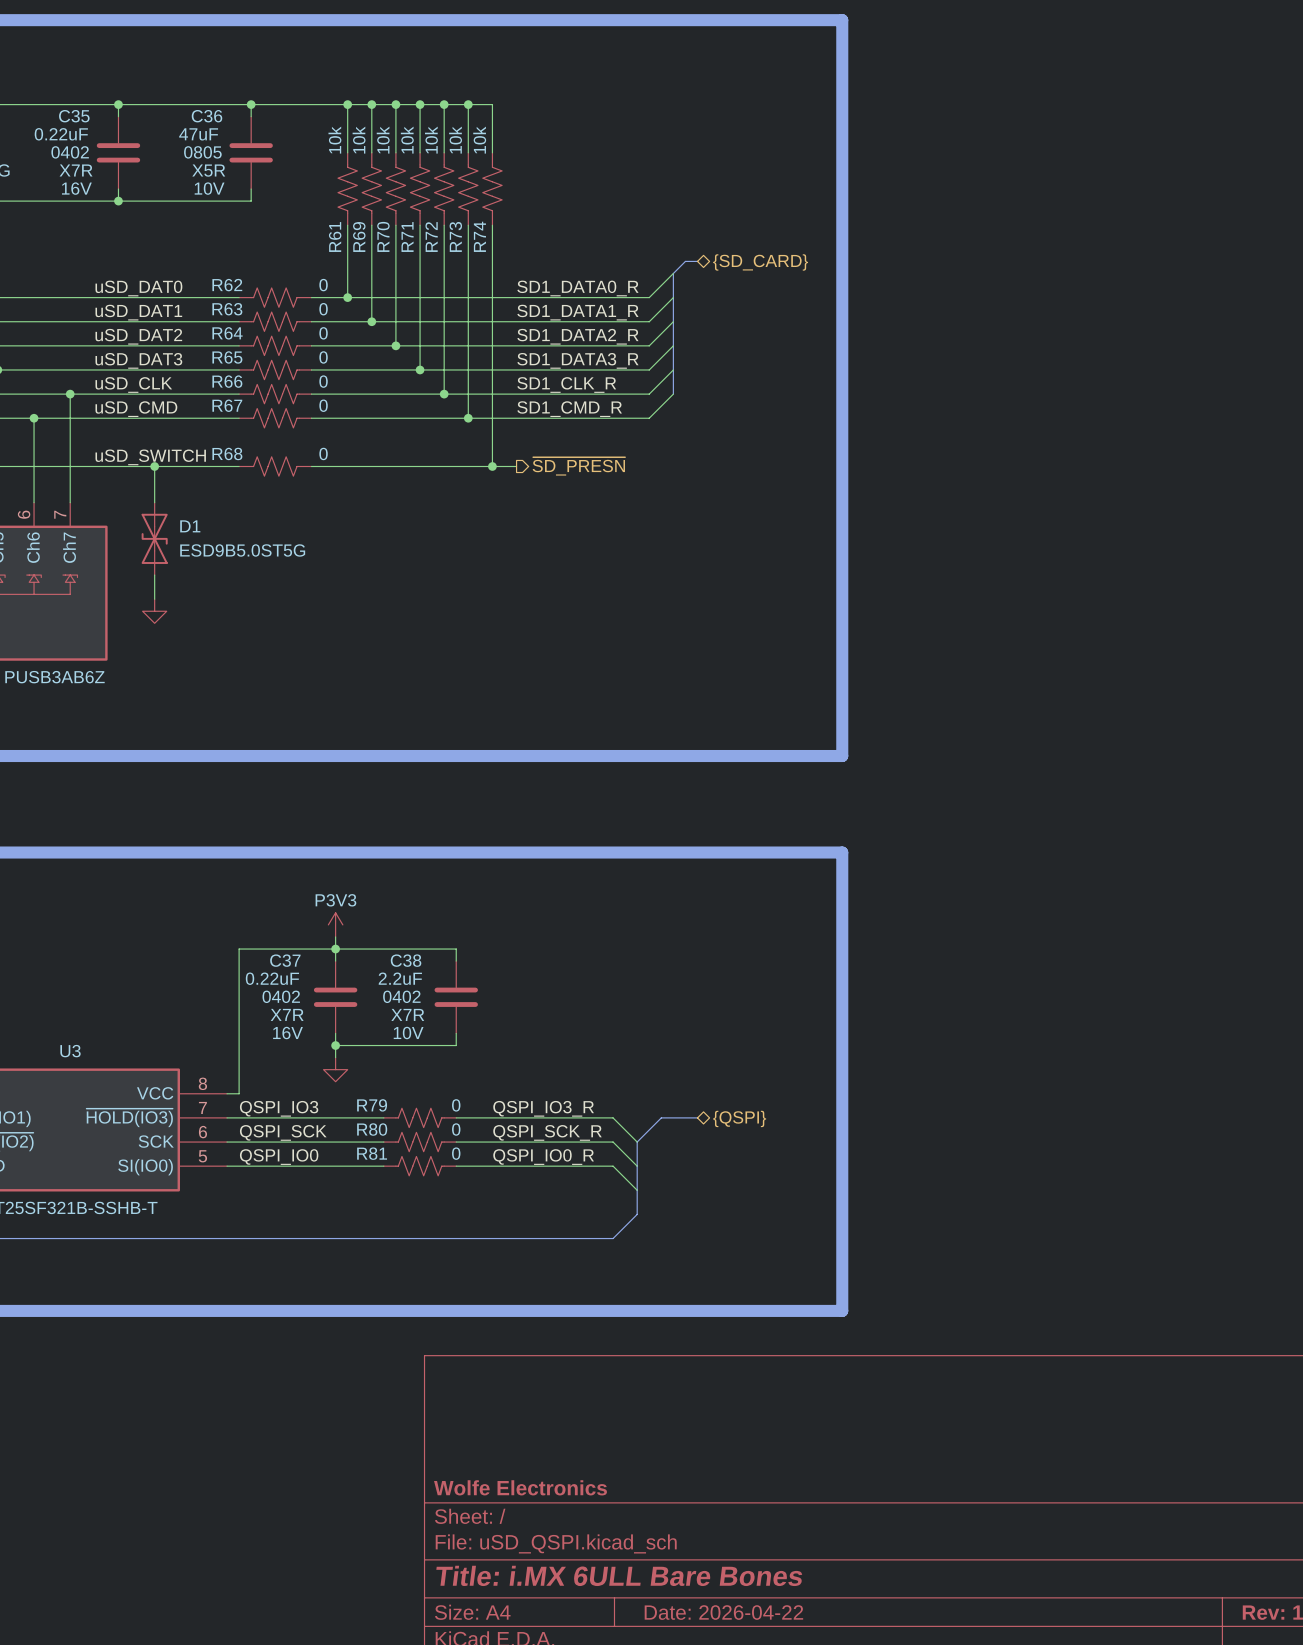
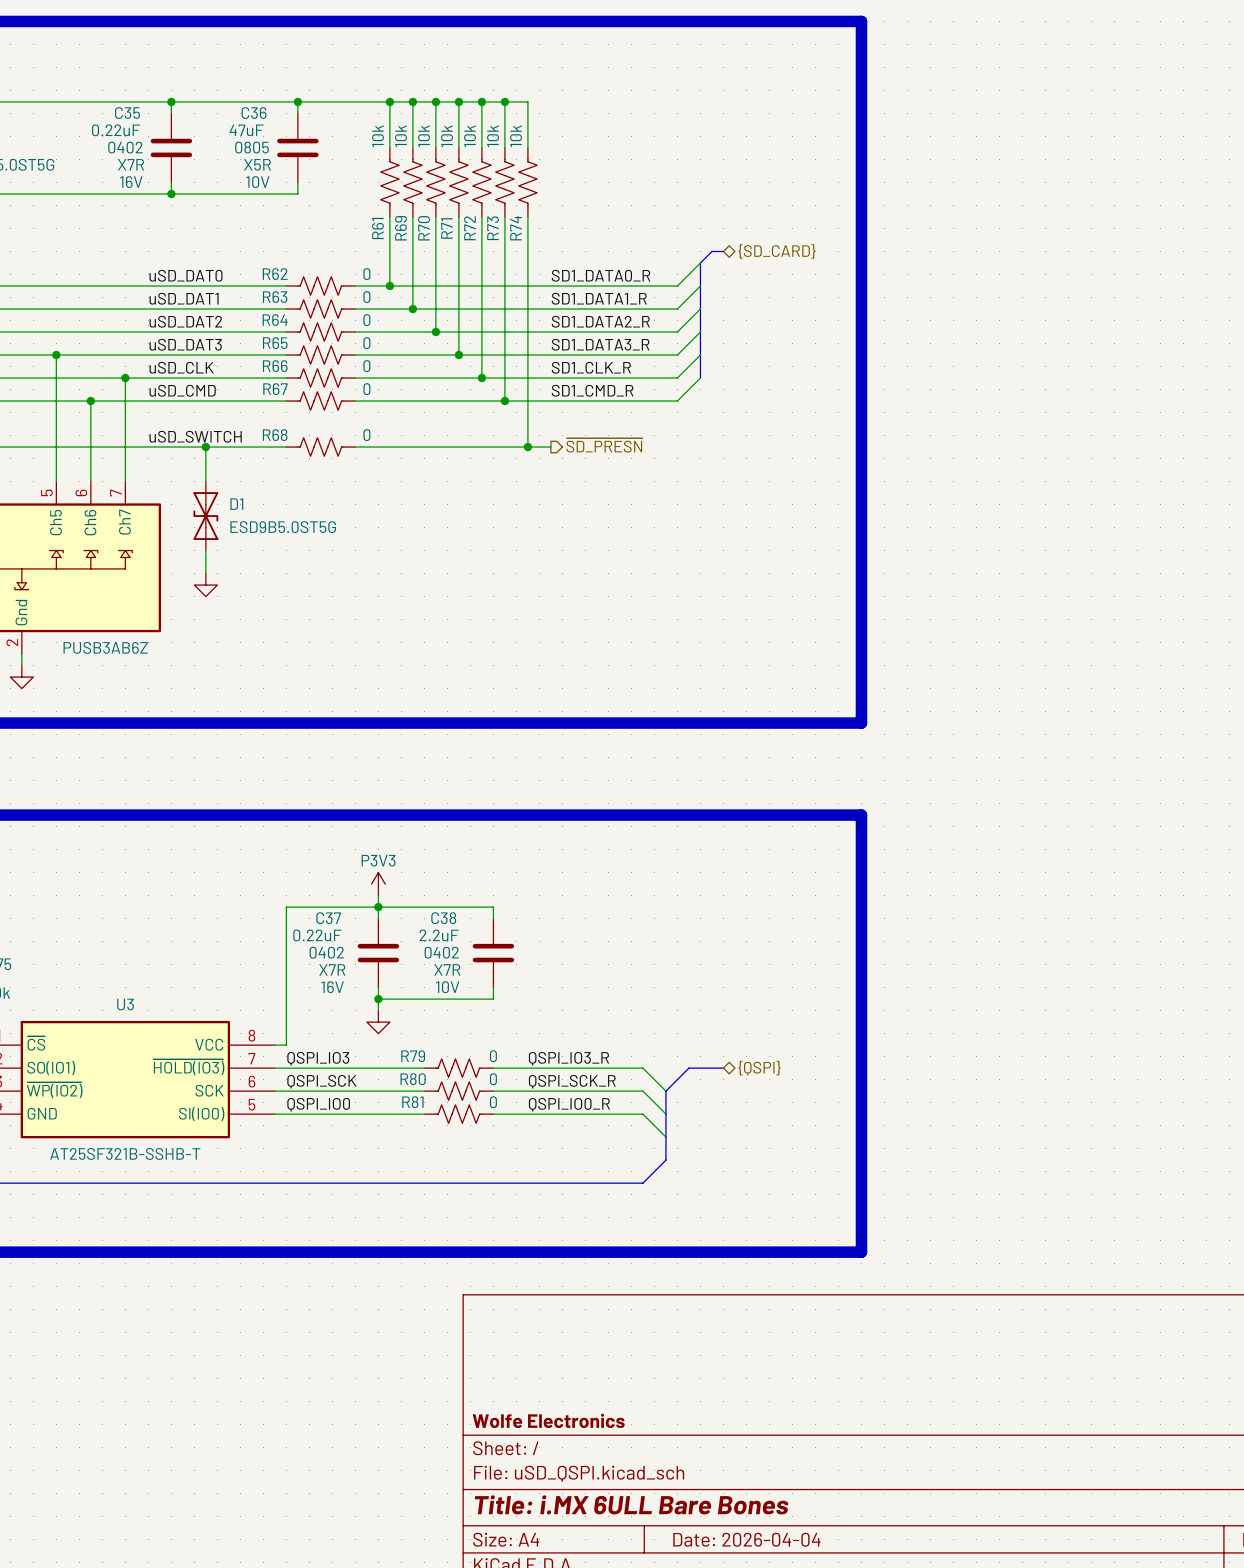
title block: Date: 2026-04-22 (723, 1612) -> Date: 2026-04-04 (746, 1539)

